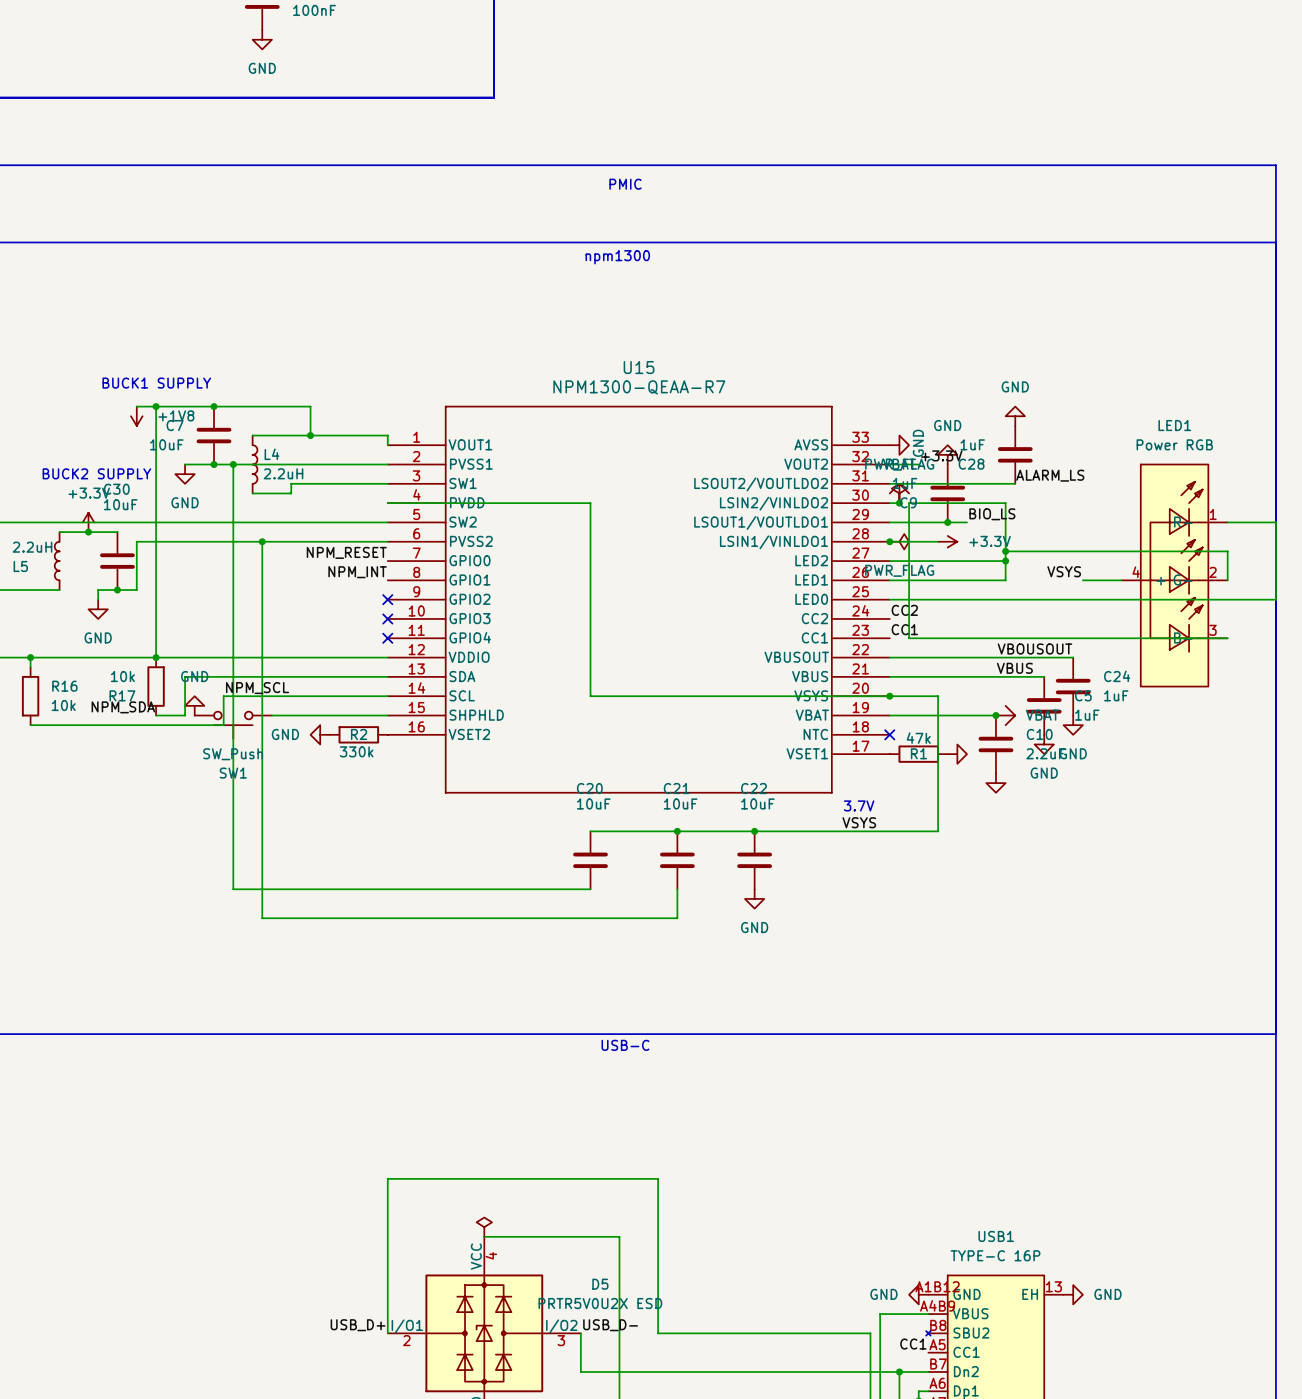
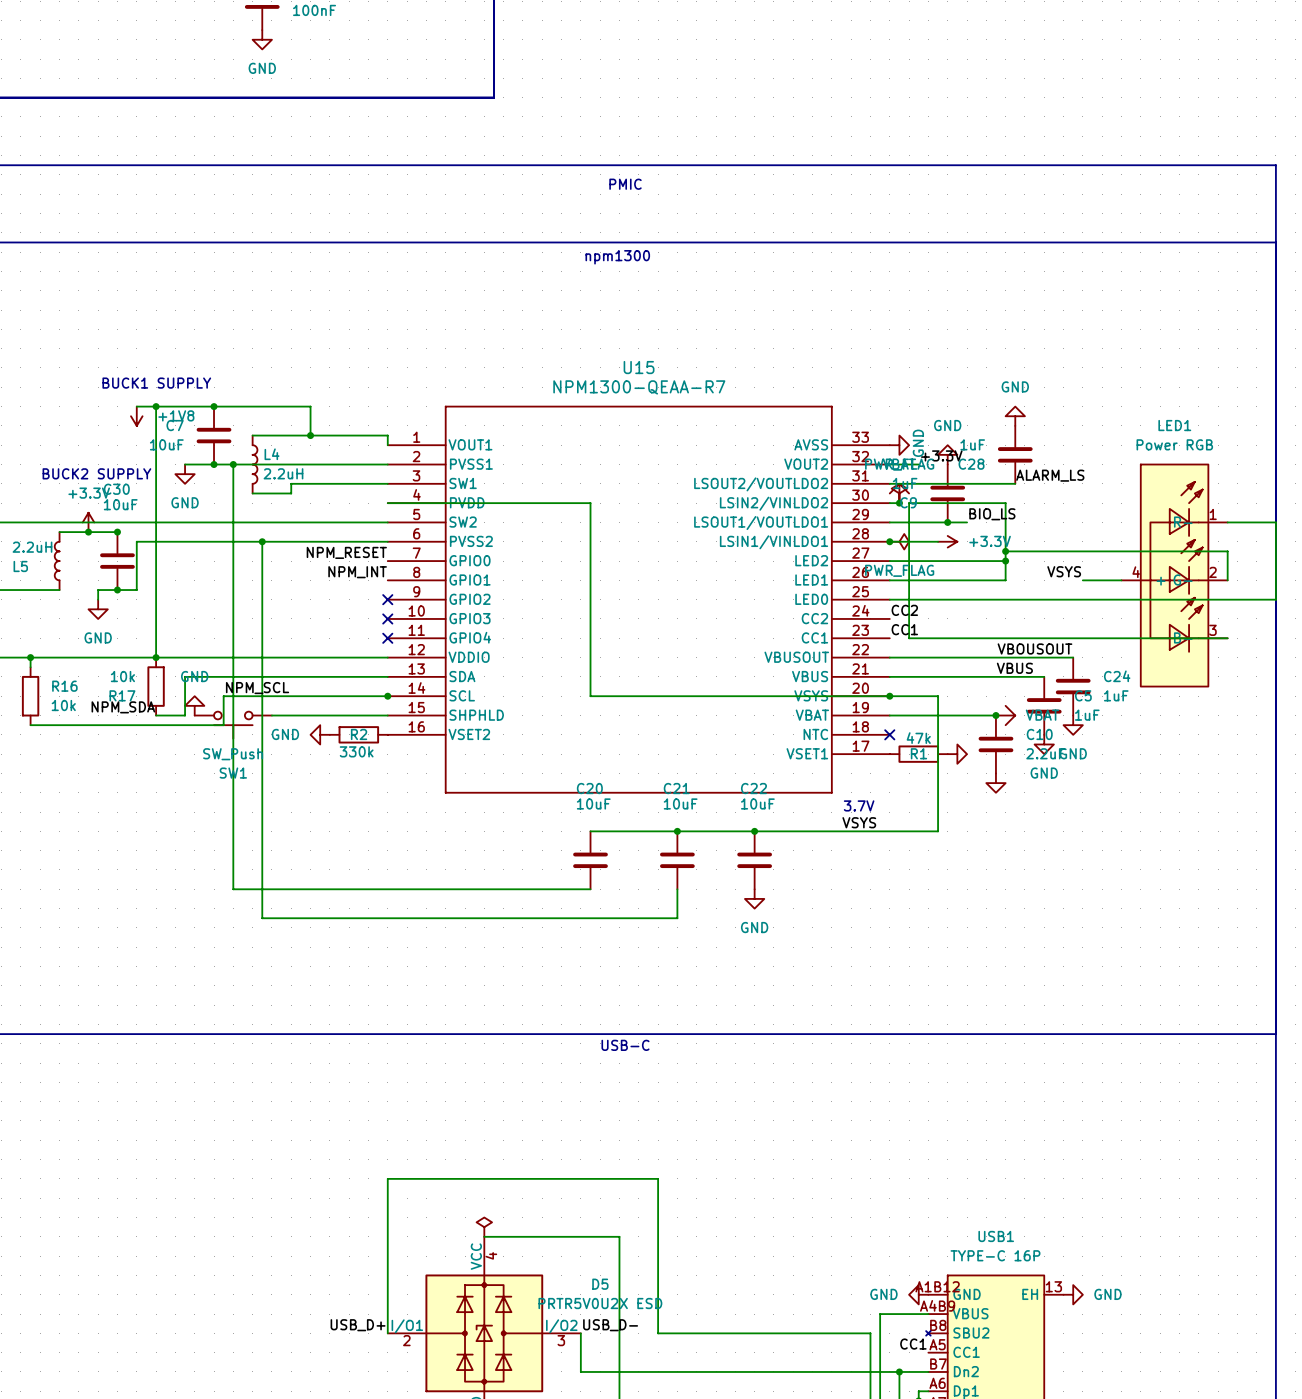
junction: none -> (117, 532)
junction: none -> (387, 696)

